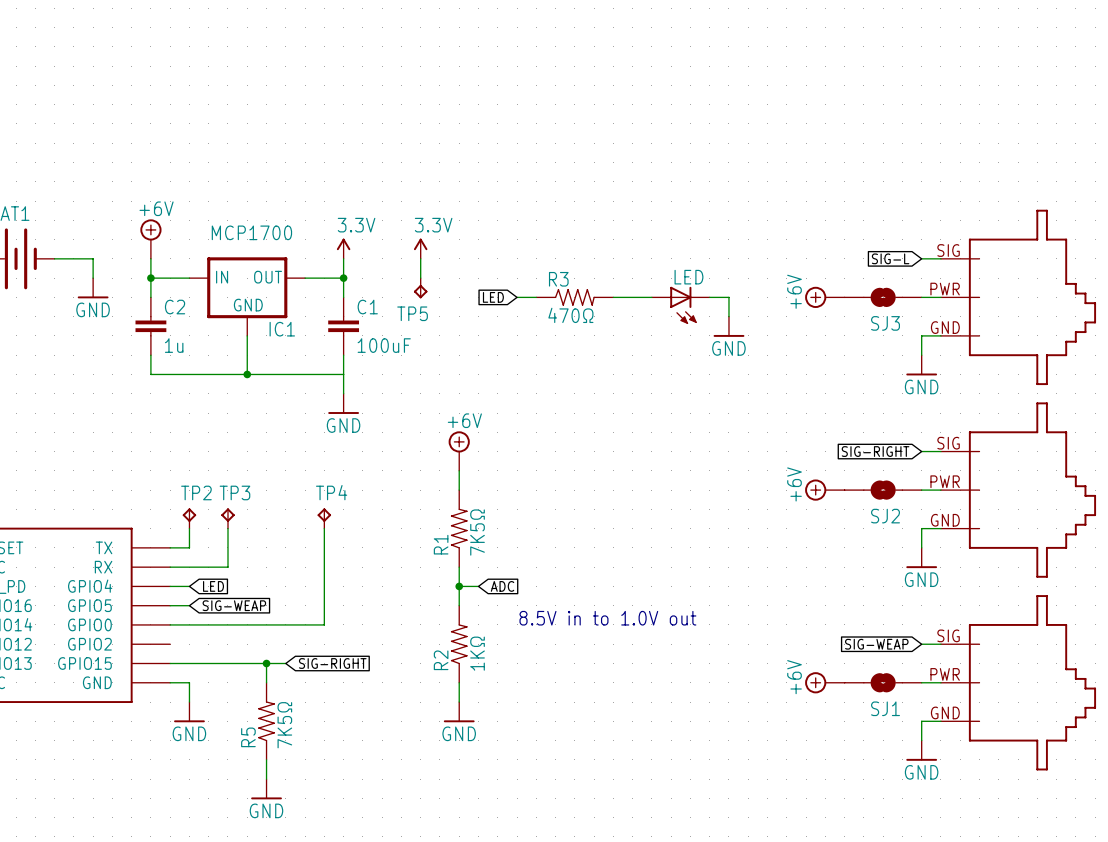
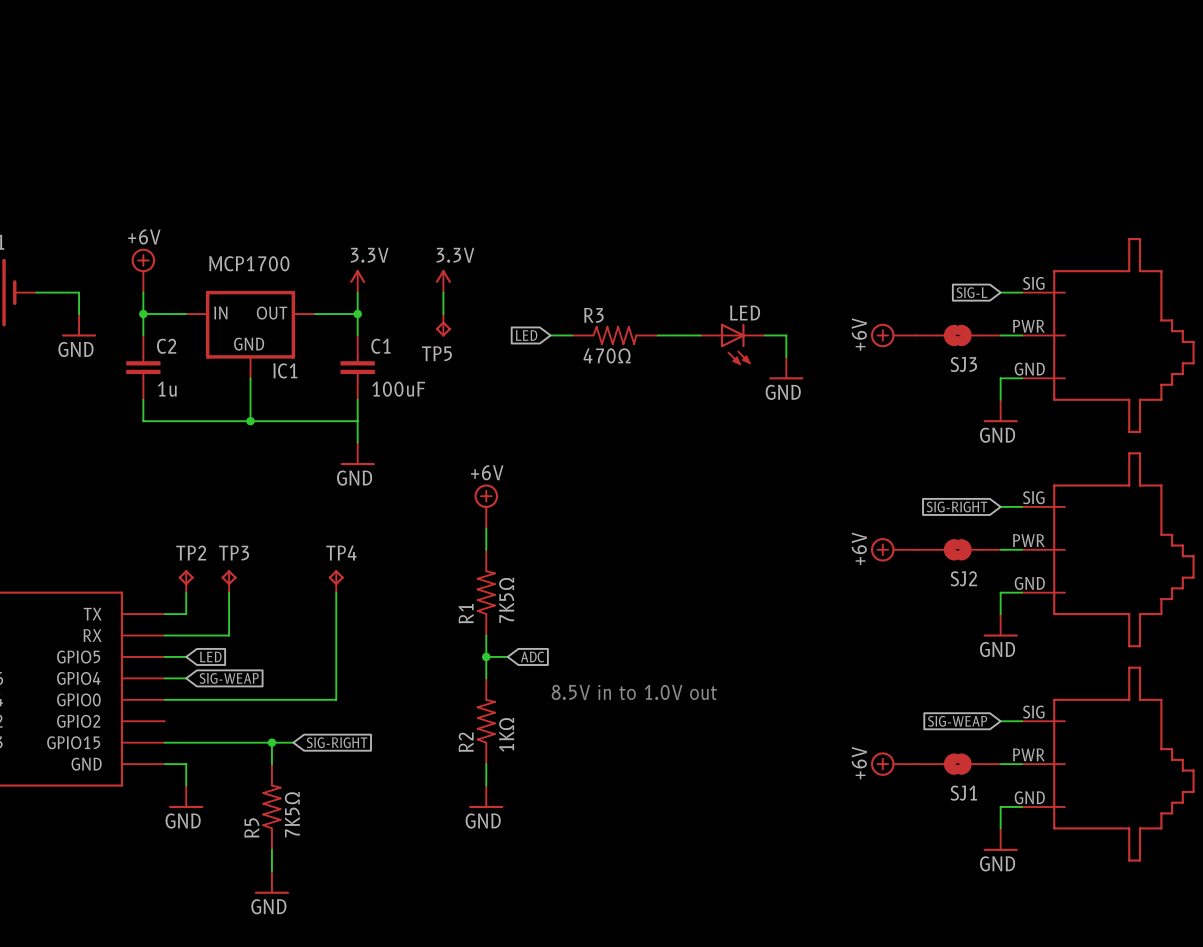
part pin name: GPIO4 (90, 586) -> GPIO5 (78, 657)
part pin name: GPIO5 (89, 605) -> GPIO4 (78, 678)

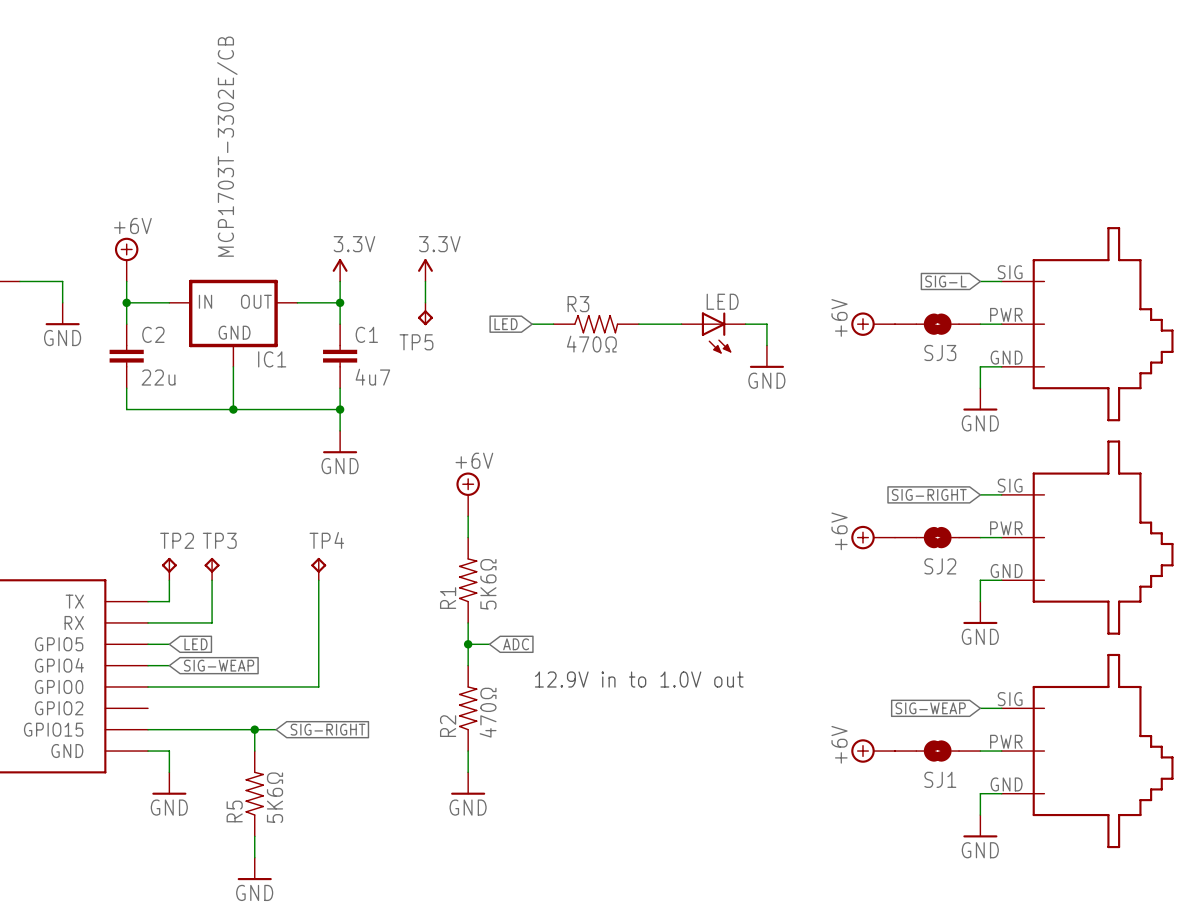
IC1 value: MCP1700 (249, 263) -> MCP1703T-3302E/CB (227, 146)
C2 value: 1u (167, 389) -> 22u (158, 377)
C1 value: 100uF (398, 389) -> 4u7 (372, 377)
junction: none -> (340, 409)
R1 value: 7K5Ω (506, 600) -> 5K6Ω (488, 584)
text: 8.5V in to 1.0V out (634, 692) -> 12.9V in to 1.0V out (639, 679)
R2 value: 1KΩ (506, 734) -> 470Ω (488, 712)
R5 value: 7K5Ω (292, 814) -> 5K6Ω (275, 797)

